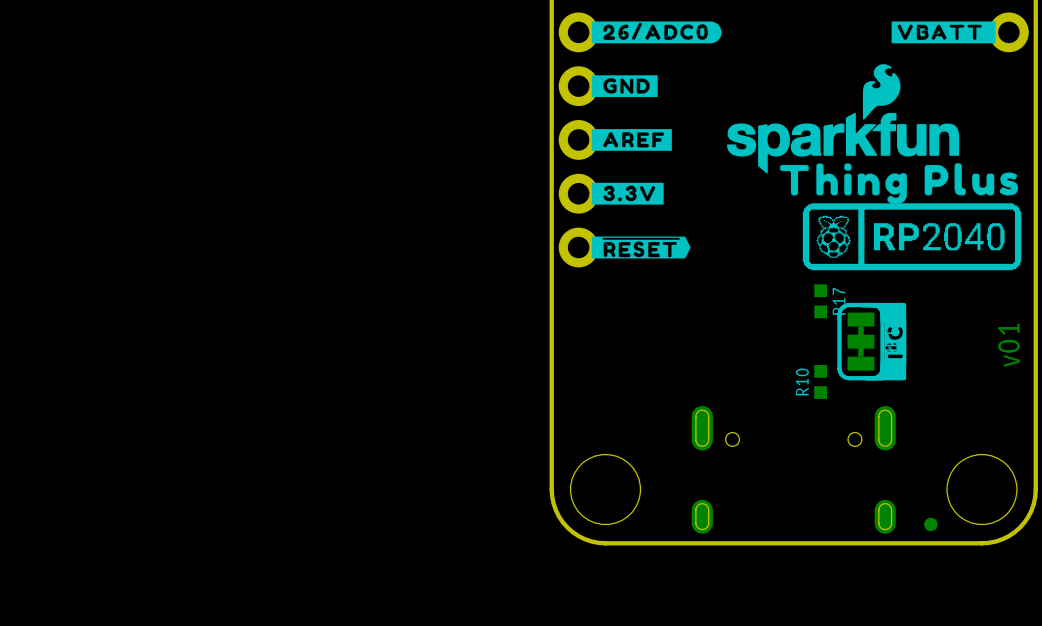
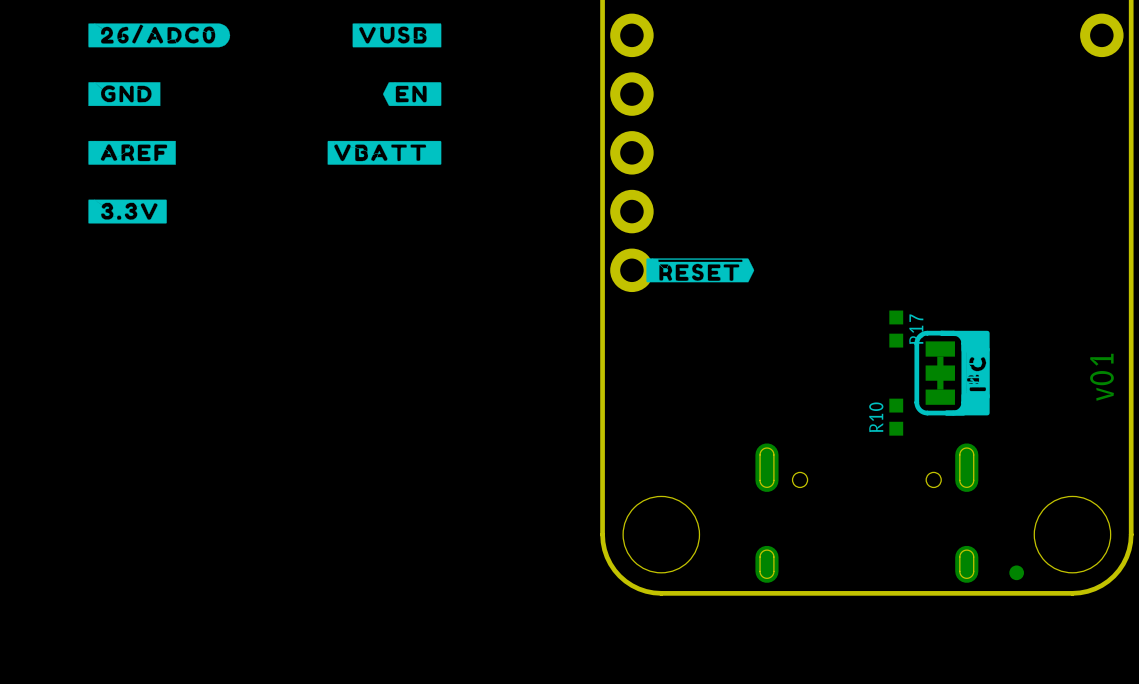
drawing: none -> [352, 23, 442, 48]
drawing: [726, 21, 1022, 271] -> none
drawing position: (656, 32) -> (159, 35)
drawing: none -> [382, 82, 442, 107]
drawing position: (624, 86) -> (124, 94)
drawing: none -> [327, 140, 442, 165]
drawing position: (631, 139) -> (132, 152)
drawing position: (627, 193) -> (127, 211)

